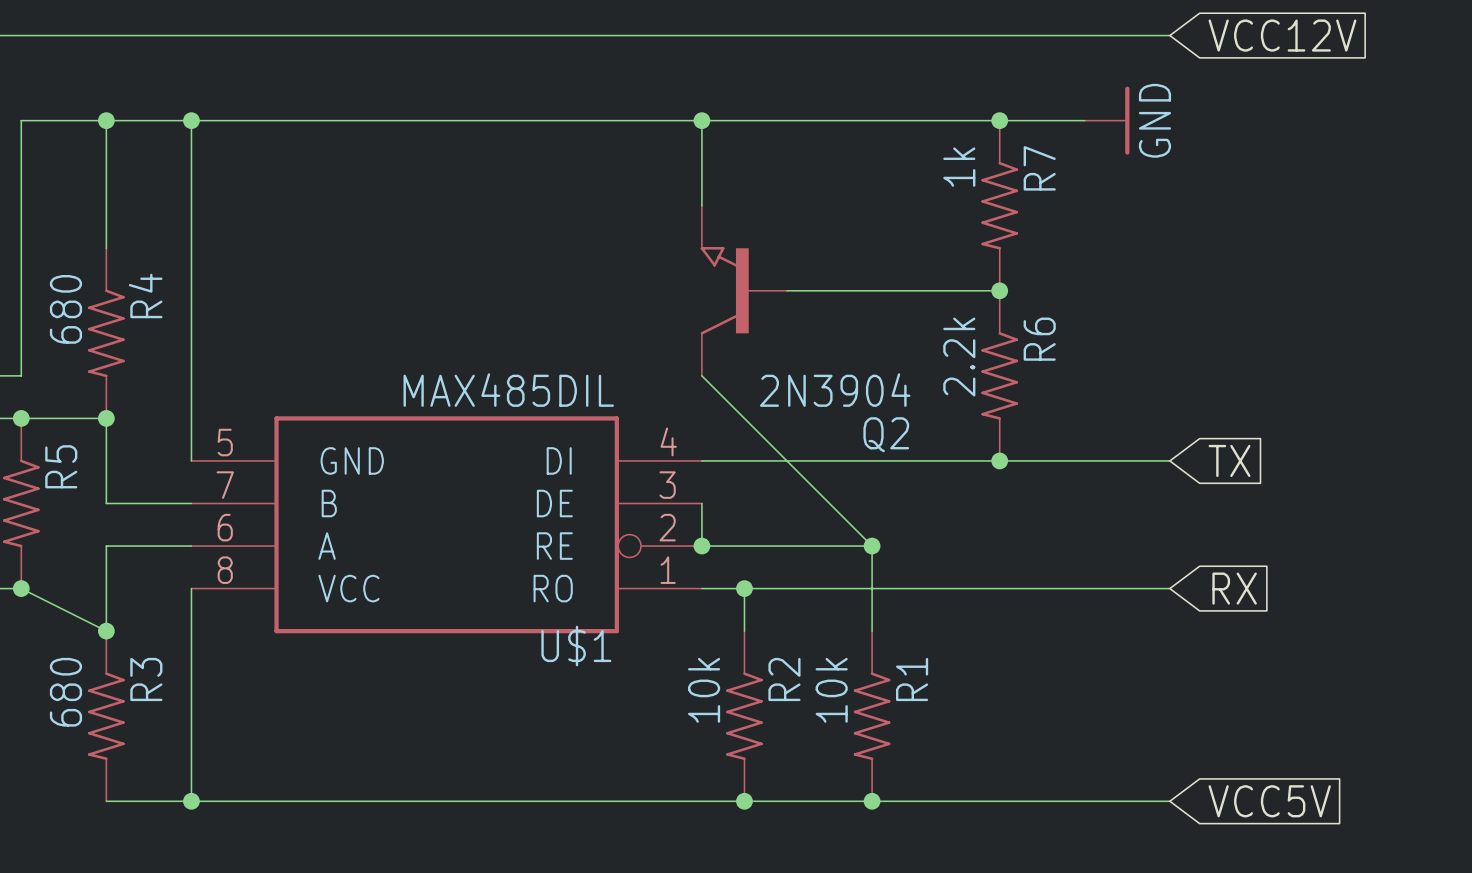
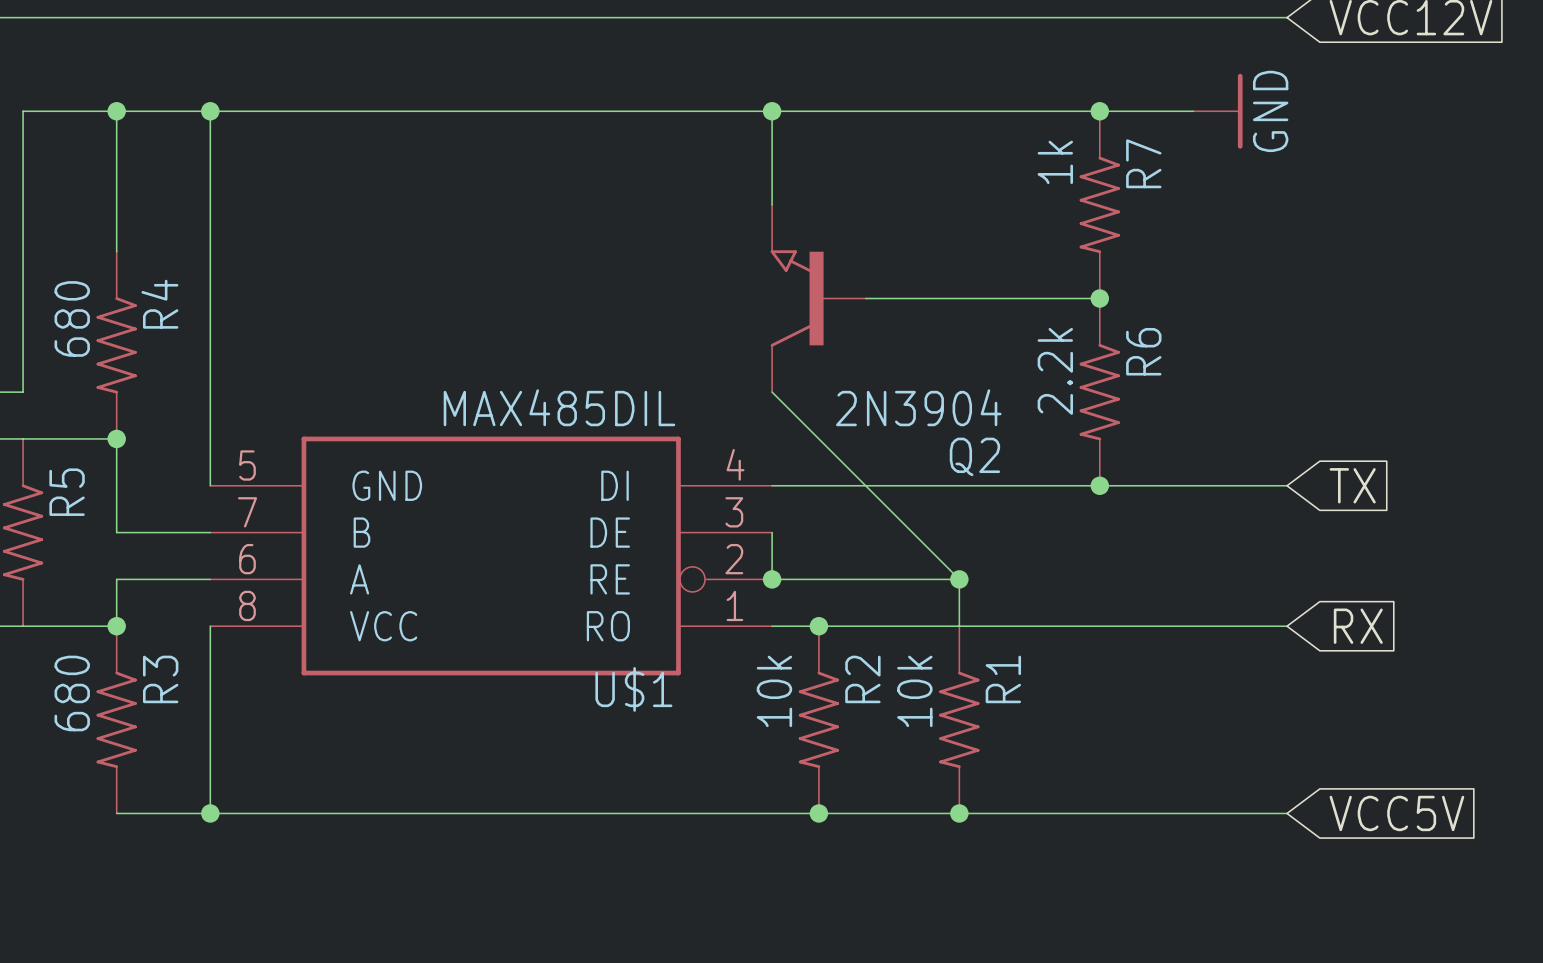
junction: (21, 418) -> none
wire: (21, 588) (106, 631) (106, 588) -> (23, 626) (116, 626)
junction: (21, 588) -> none
junction: none -> (116, 626)
junction: (106, 631) -> none
R3 position: (106, 716) -> (116, 719)
R2 position: (744, 716) -> (818, 719)
R1 position: (872, 716) -> (959, 719)
wire: (191, 758) (191, 801) -> none
wire: (106, 801) (1169, 801) -> (116, 813) (1287, 813)
junction position: (191, 801) -> (210, 813)
junction position: (744, 801) -> (818, 813)
junction position: (872, 801) -> (959, 813)
global label position: VCC5V (1269, 801) -> VCC5V (1396, 813)

